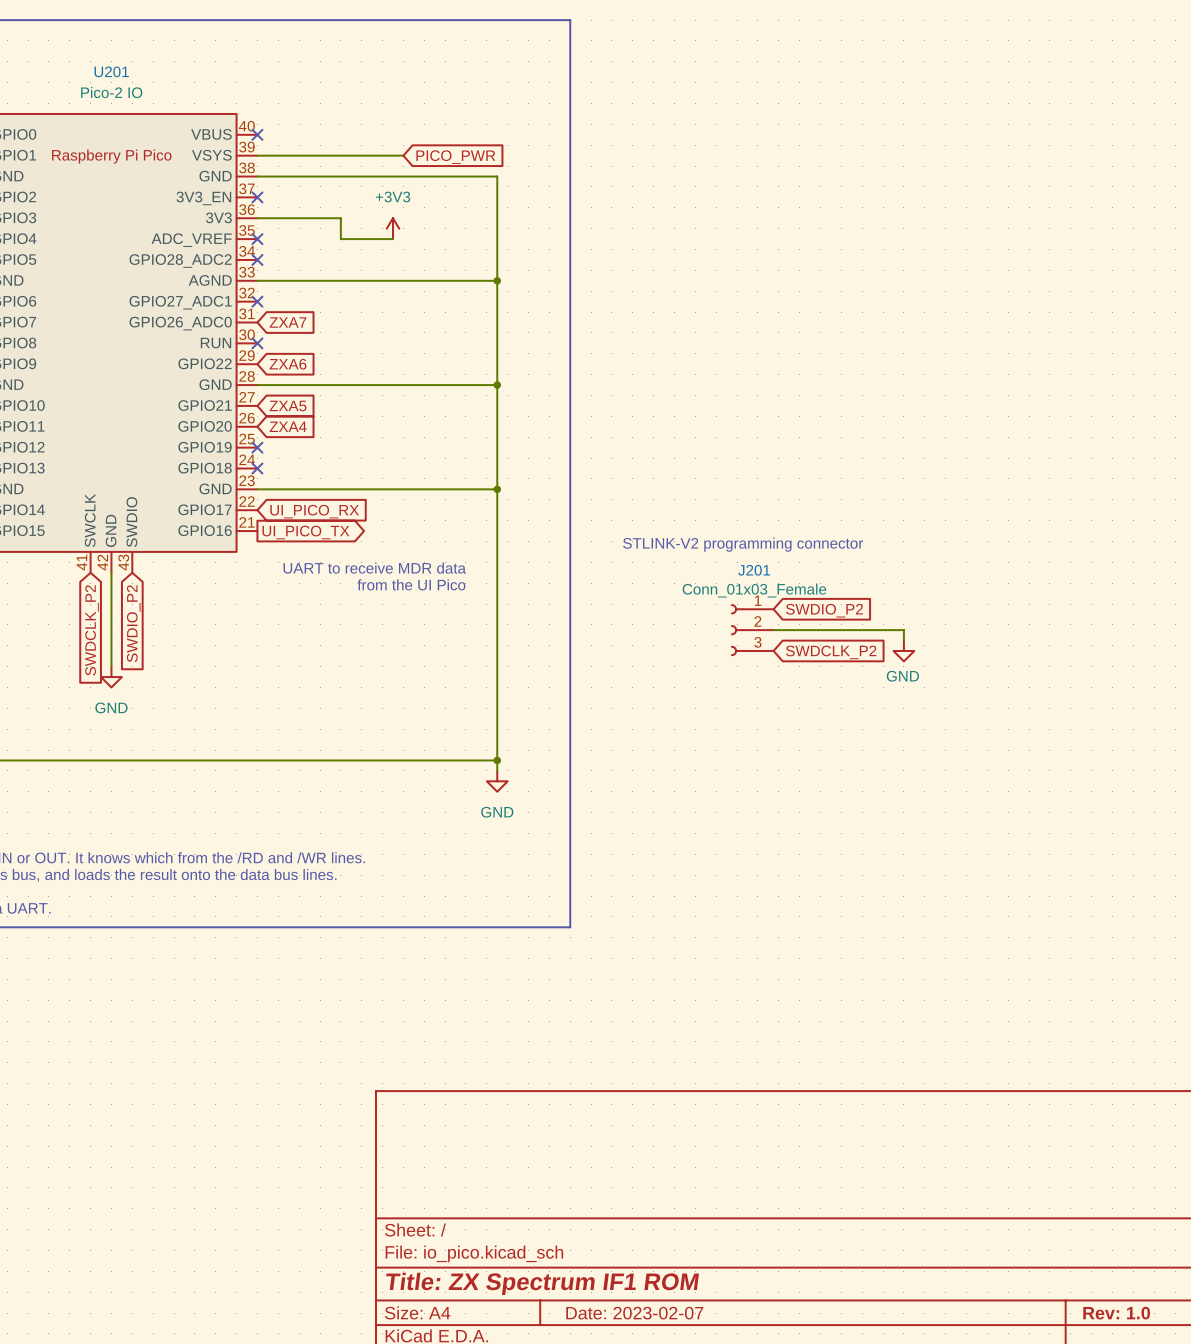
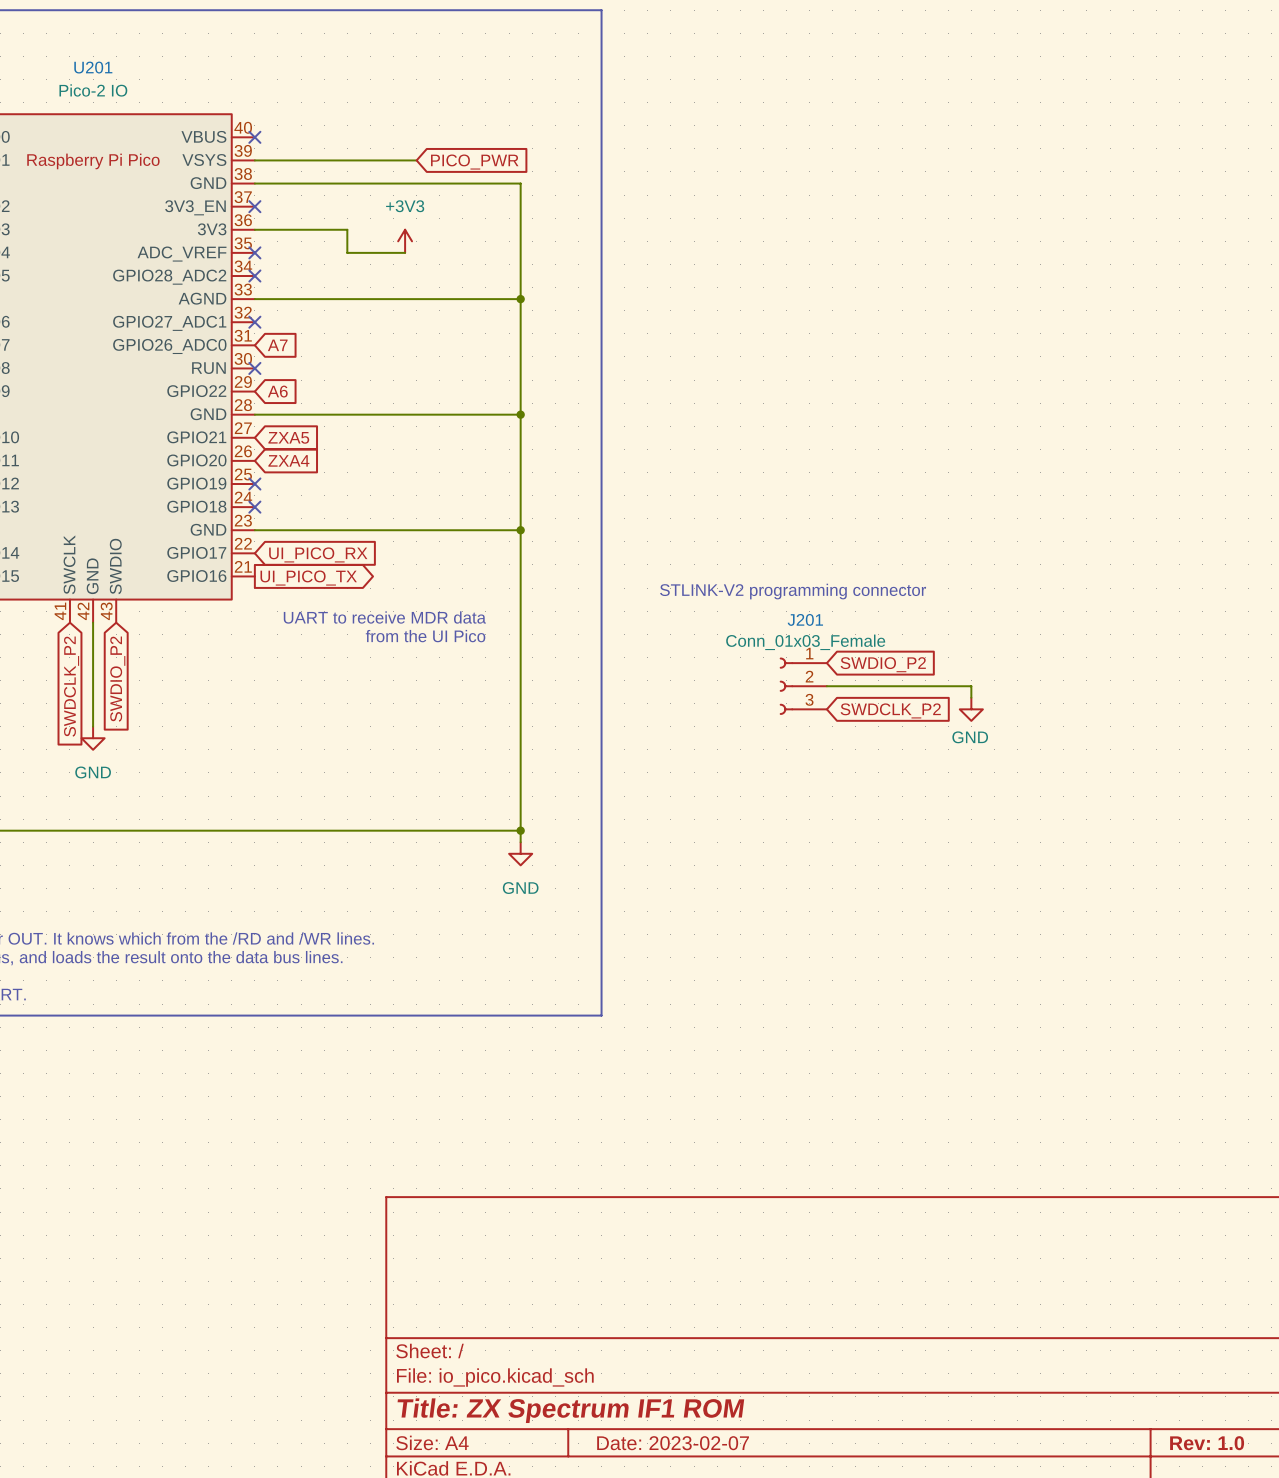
global label: ZXA7 (287, 322) -> A7 (277, 345)
global label: ZXA6 (288, 364) -> A6 (277, 391)

